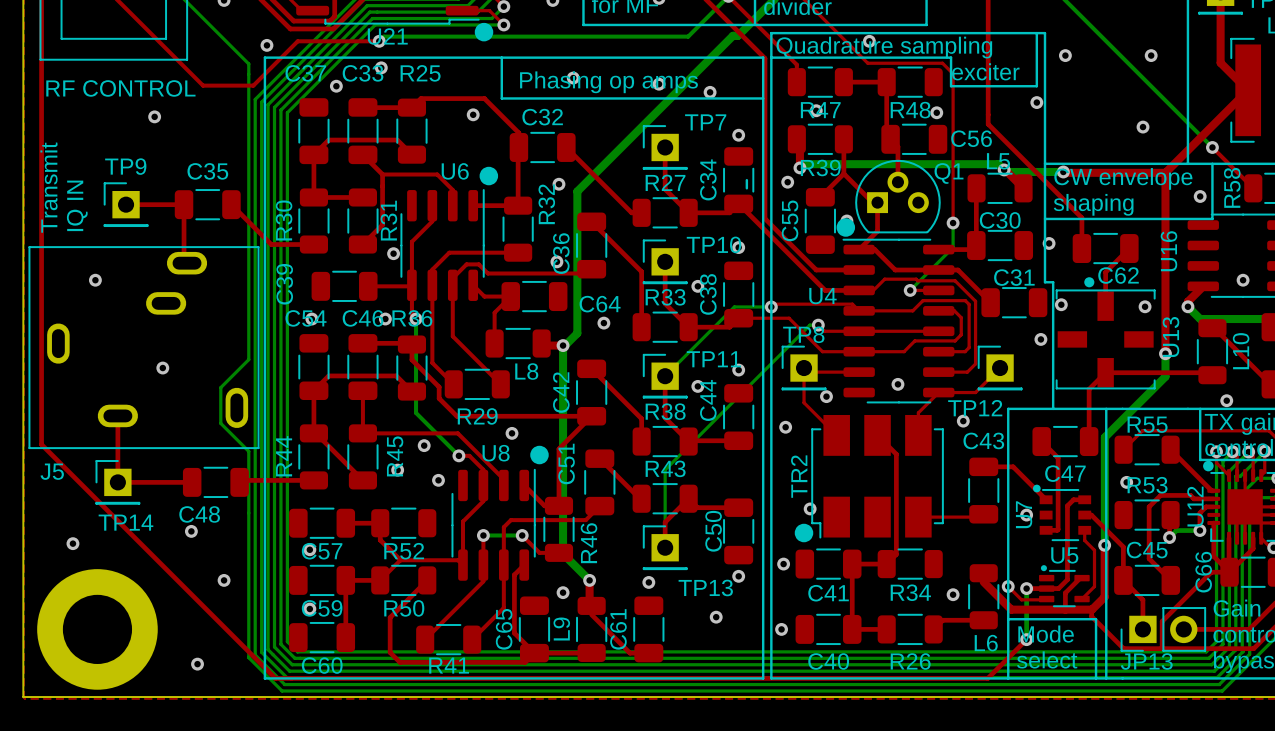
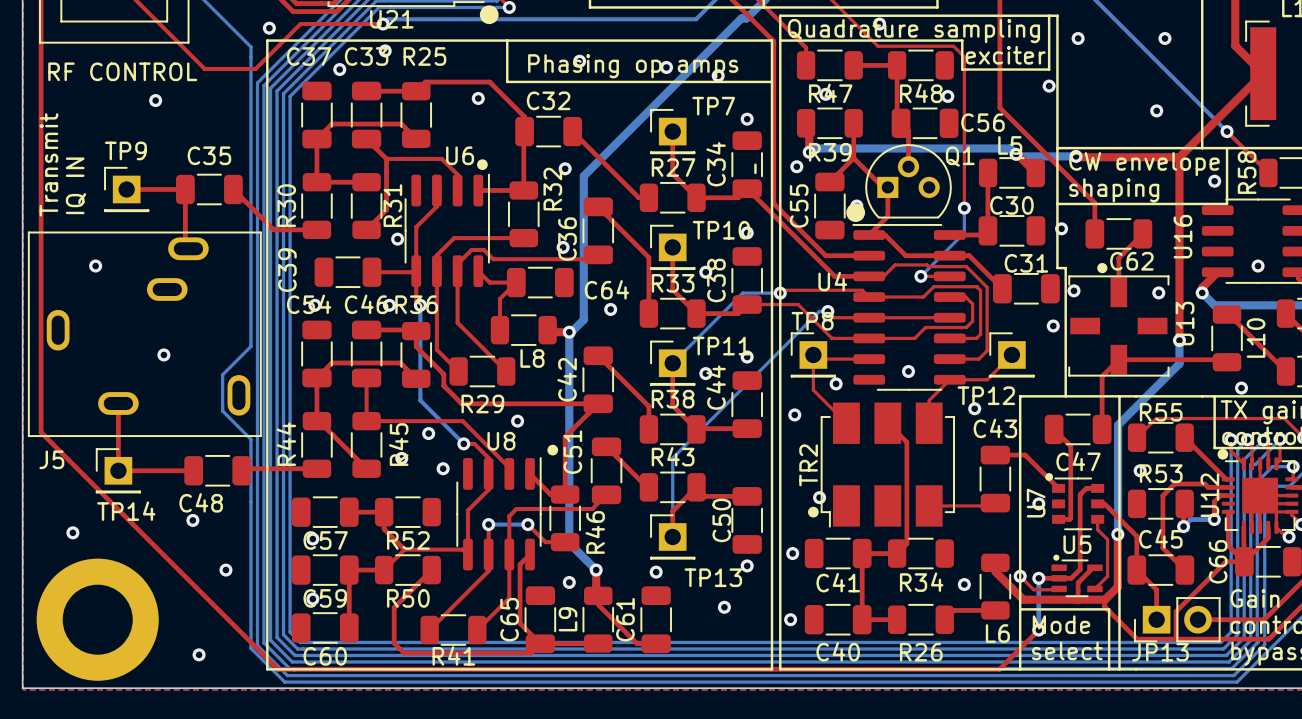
drawing shape: [479, 166, 499, 186] -> [477, 159, 488, 171]
drawing shape: [530, 445, 549, 465] -> [547, 444, 559, 456]
drawing shape: [794, 523, 814, 543] -> [808, 506, 819, 518]

